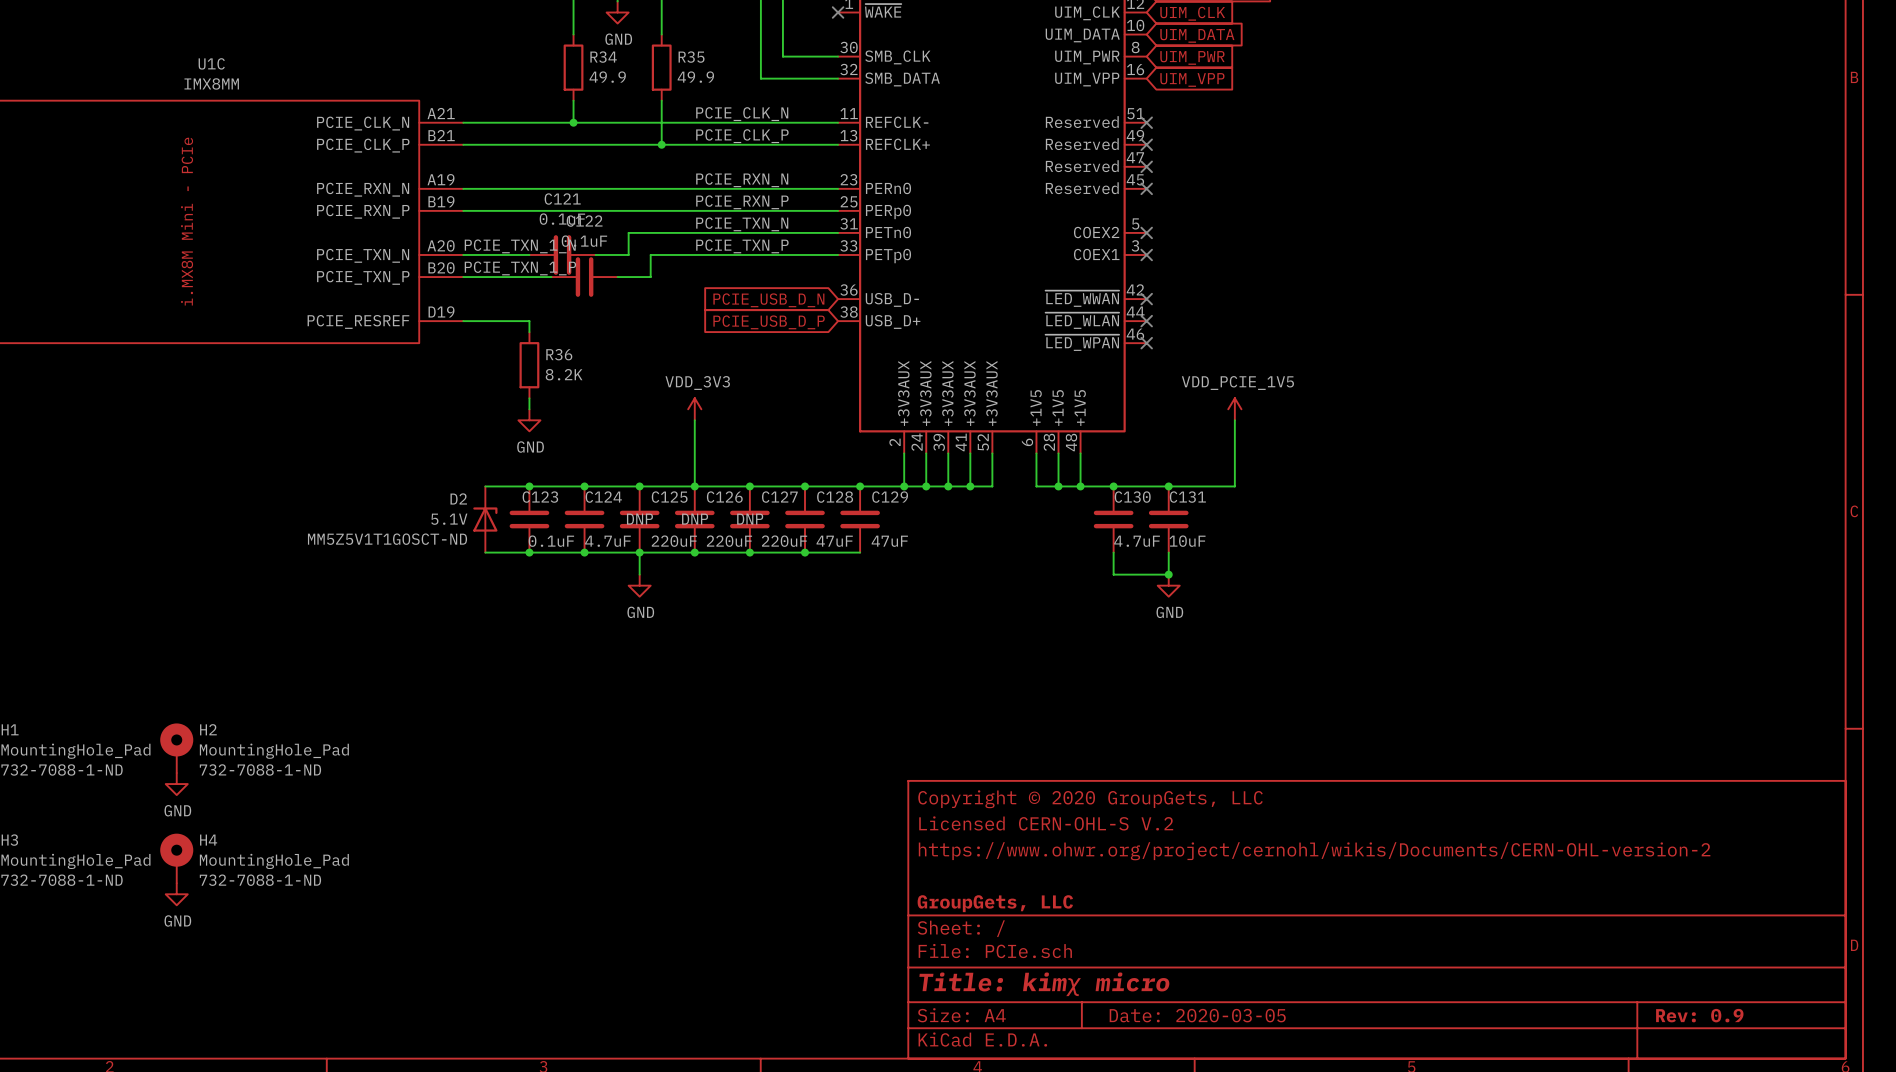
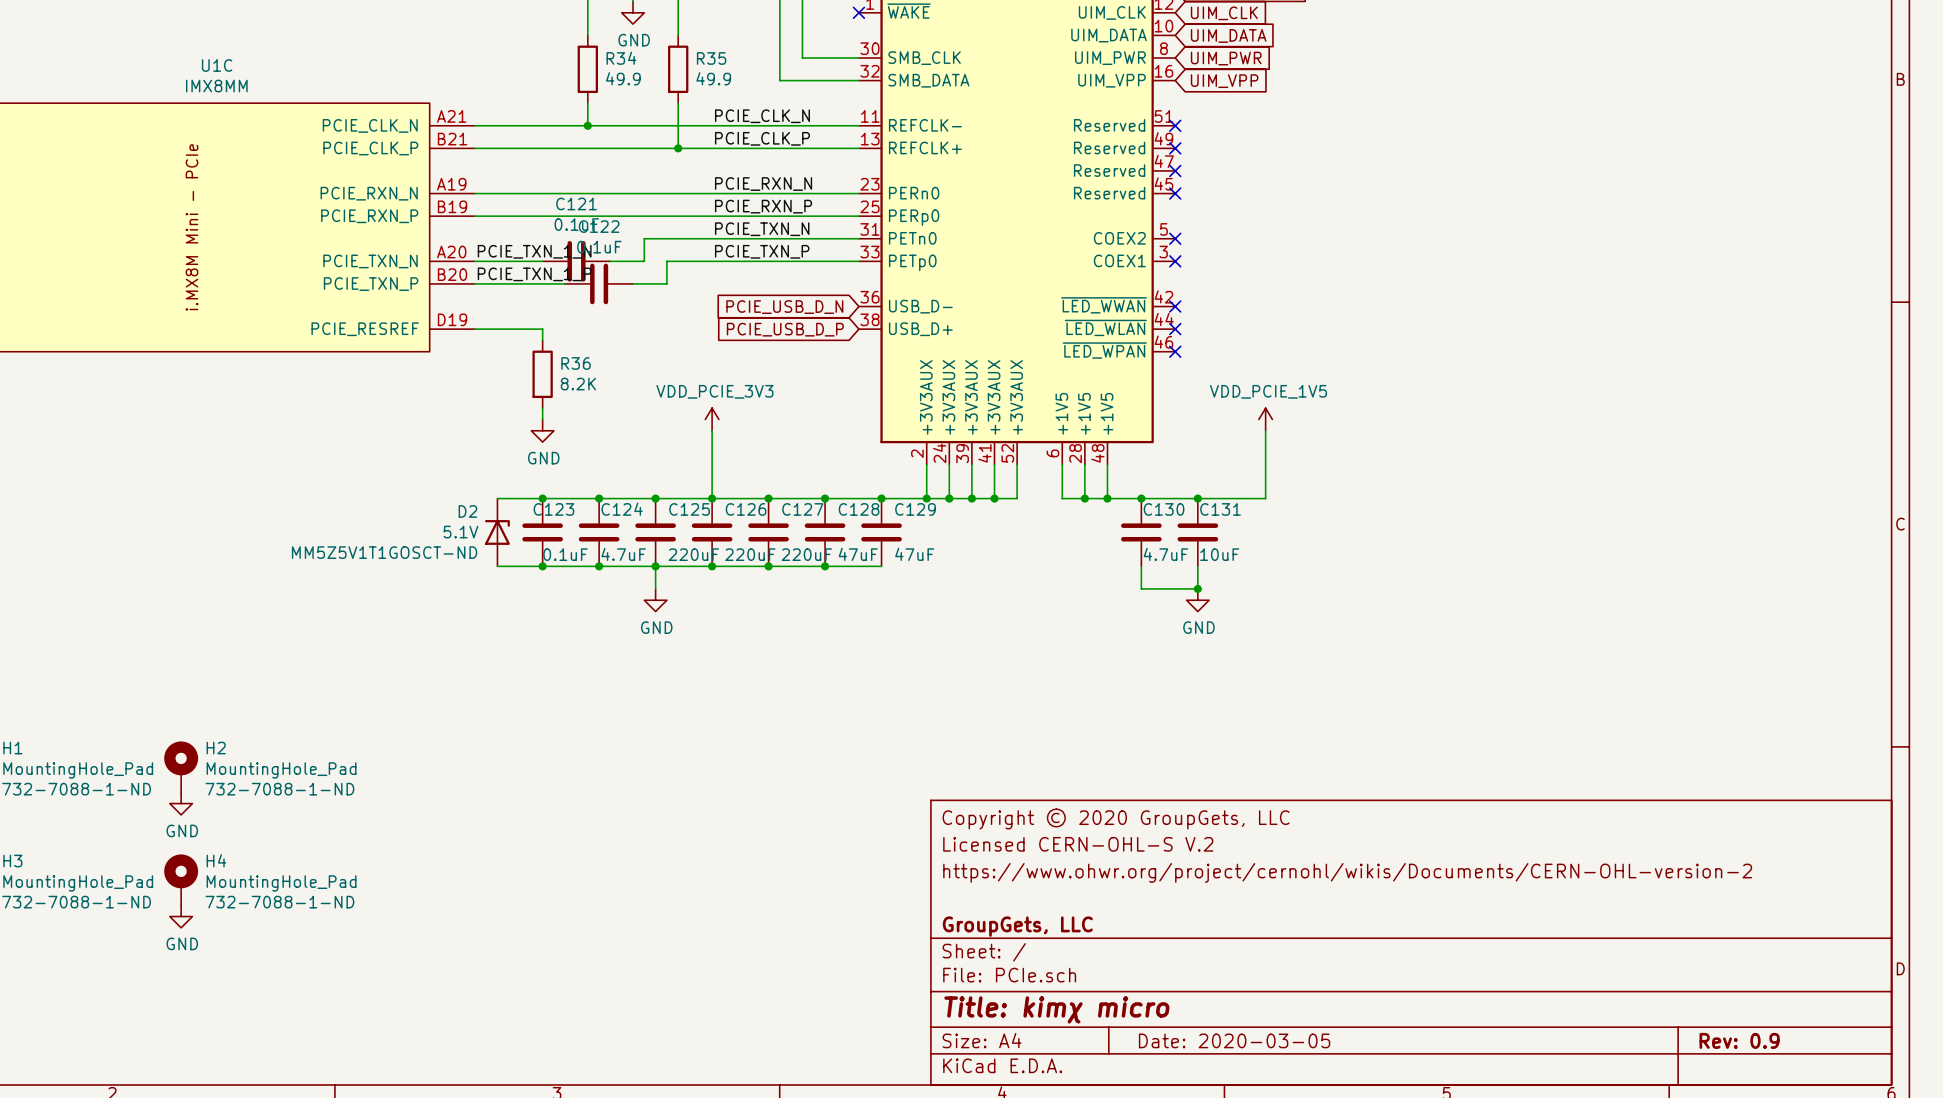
power symbol: VDD_3V3 (694, 409) -> VDD_PCIE_3V3 (712, 419)
C125 text: DNP (639, 519) -> none
C126 text: DNP (695, 519) -> none
C127 text: DNP (750, 519) -> none

